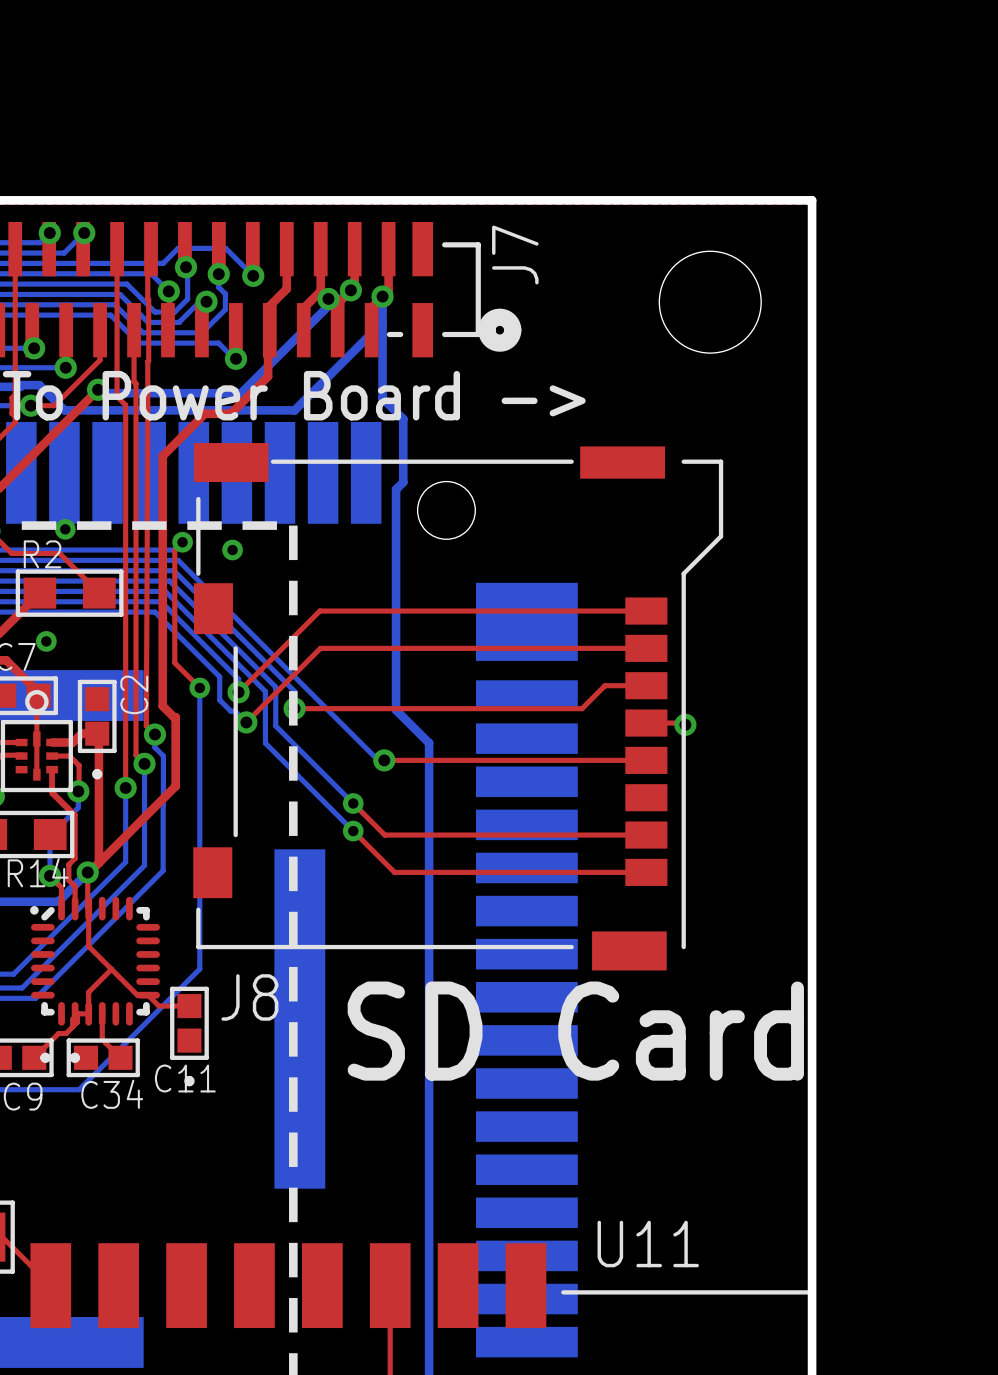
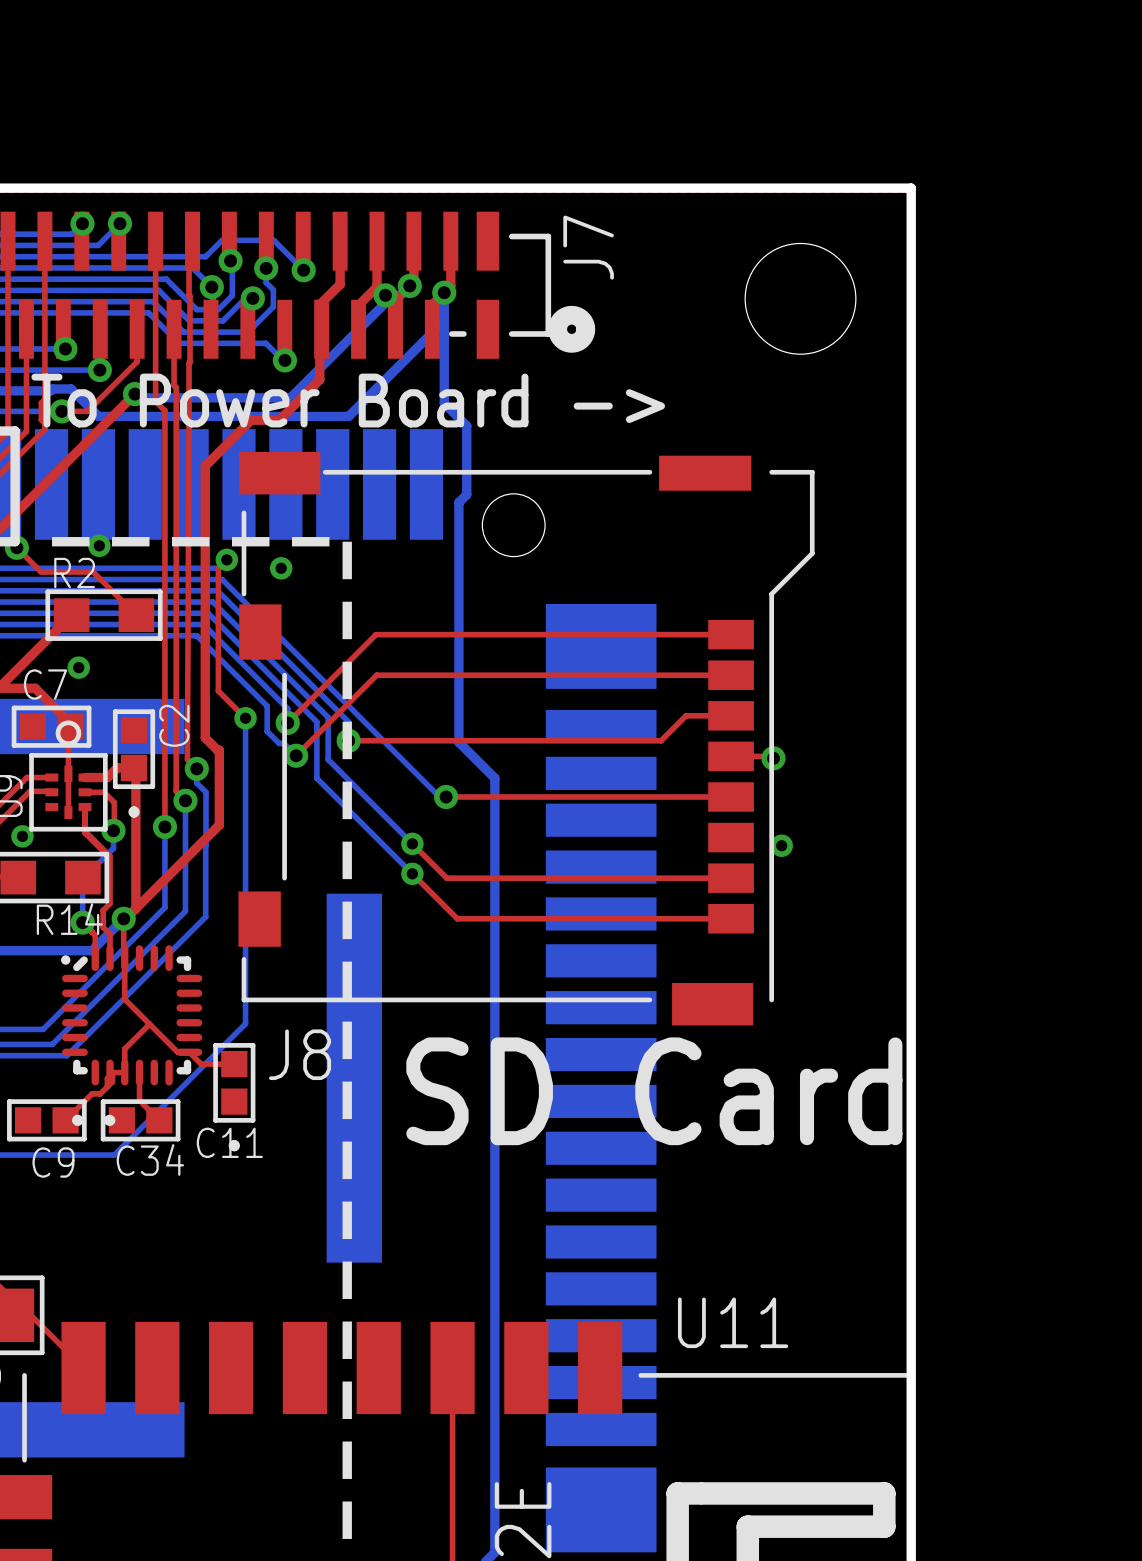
via: none -> (781, 845)

